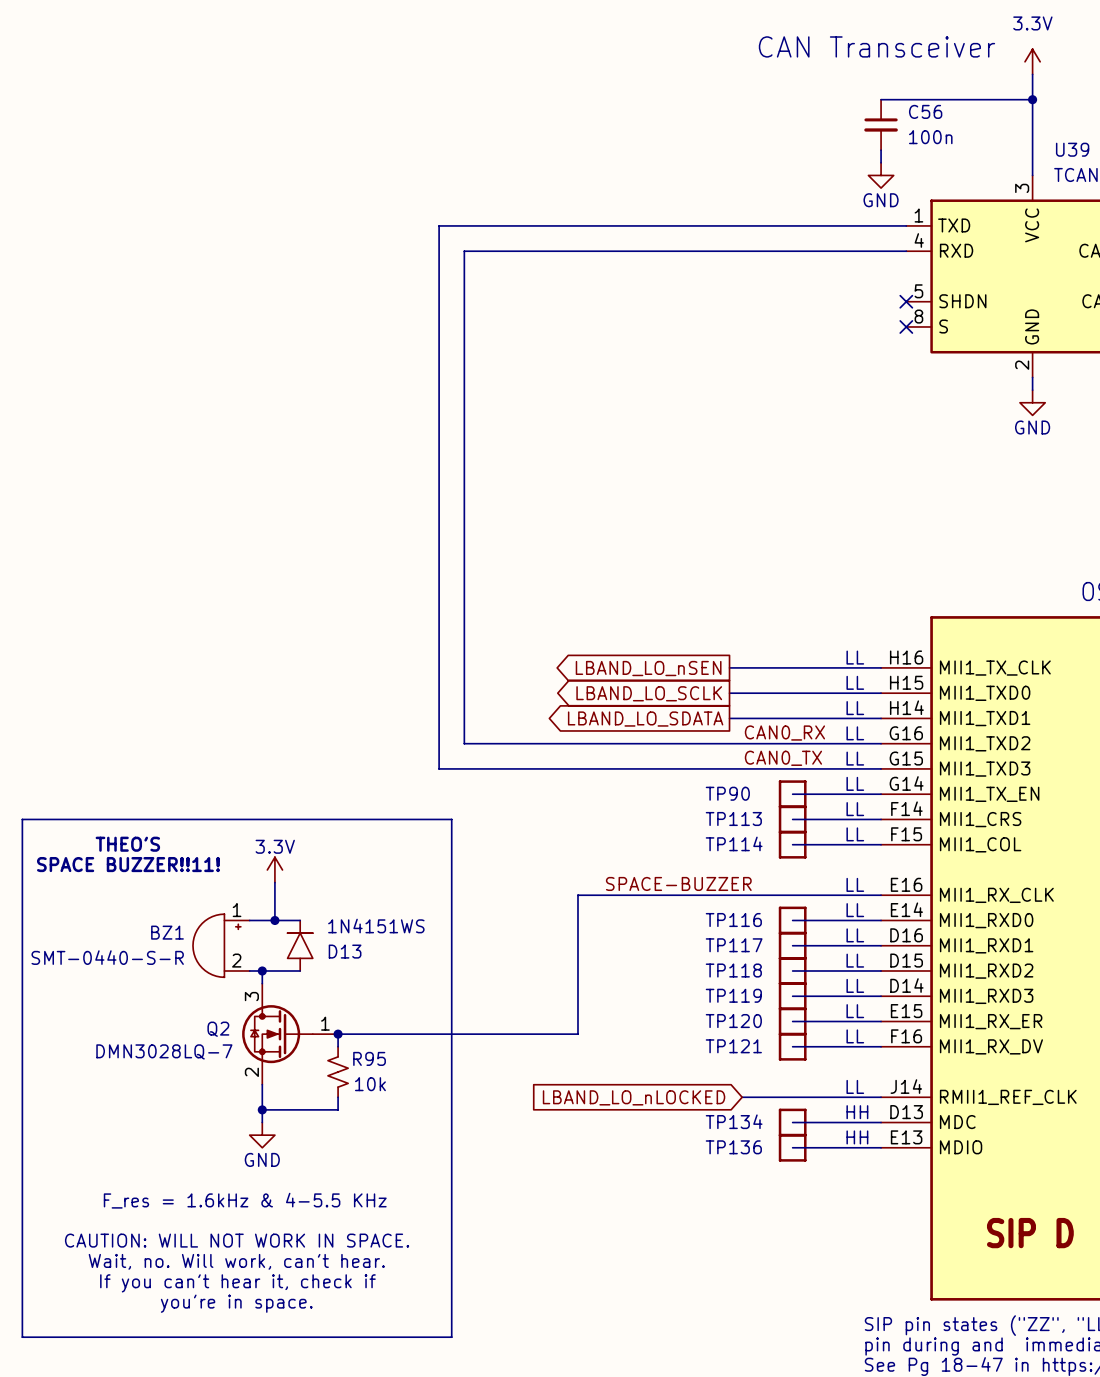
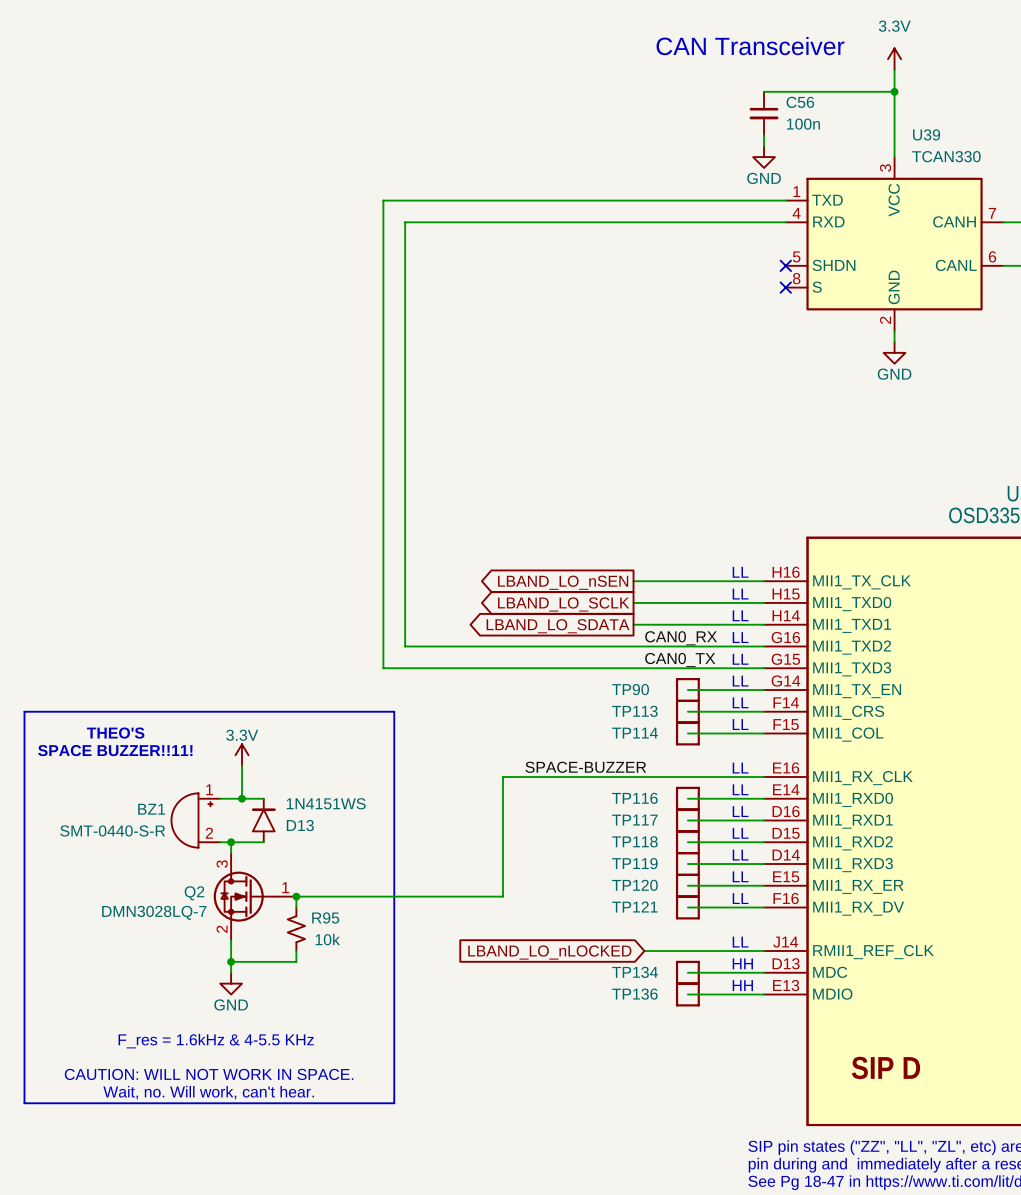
line: (22, 1274) (22, 1337) (451, 1337) (451, 1274) -> (24, 1103) (394, 1103)
text: If you can't hear it, check if (237, 1283) -> none
text: you're in space. (236, 1303) -> none

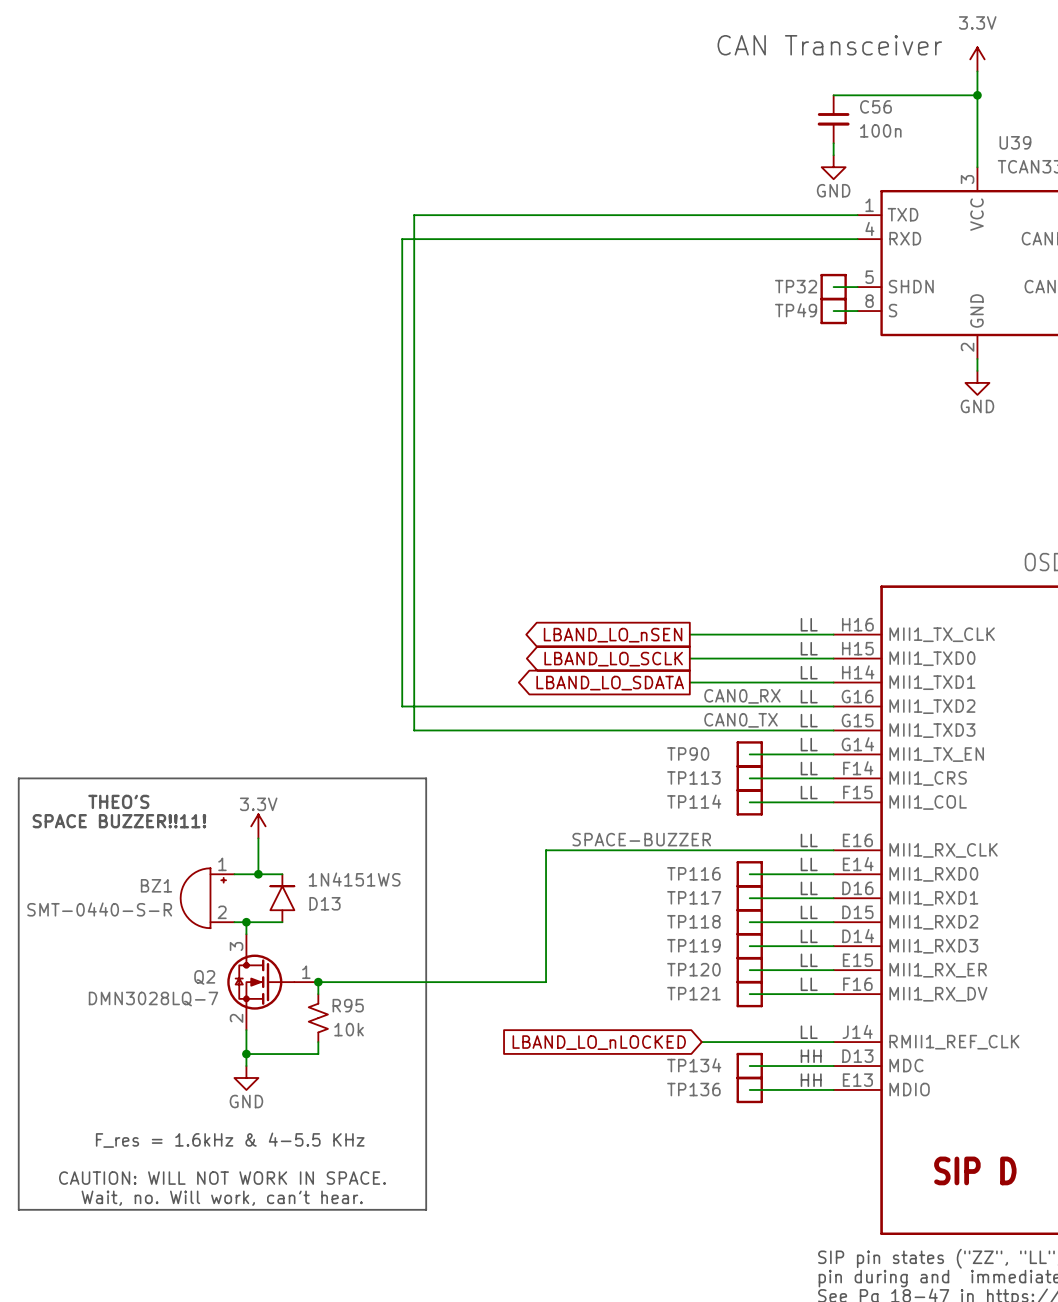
wire: (405, 222) (405, 646) -> (438, 239) (402, 239) (402, 706) (438, 706)
wire: none -> (833, 287) (857, 287)
TP32: none -> (833, 287)
no-connect mark: (785, 265) -> none
wire: none -> (833, 311) (857, 311)
TP49: none -> (833, 311)
no-connect mark: (785, 287) -> none

